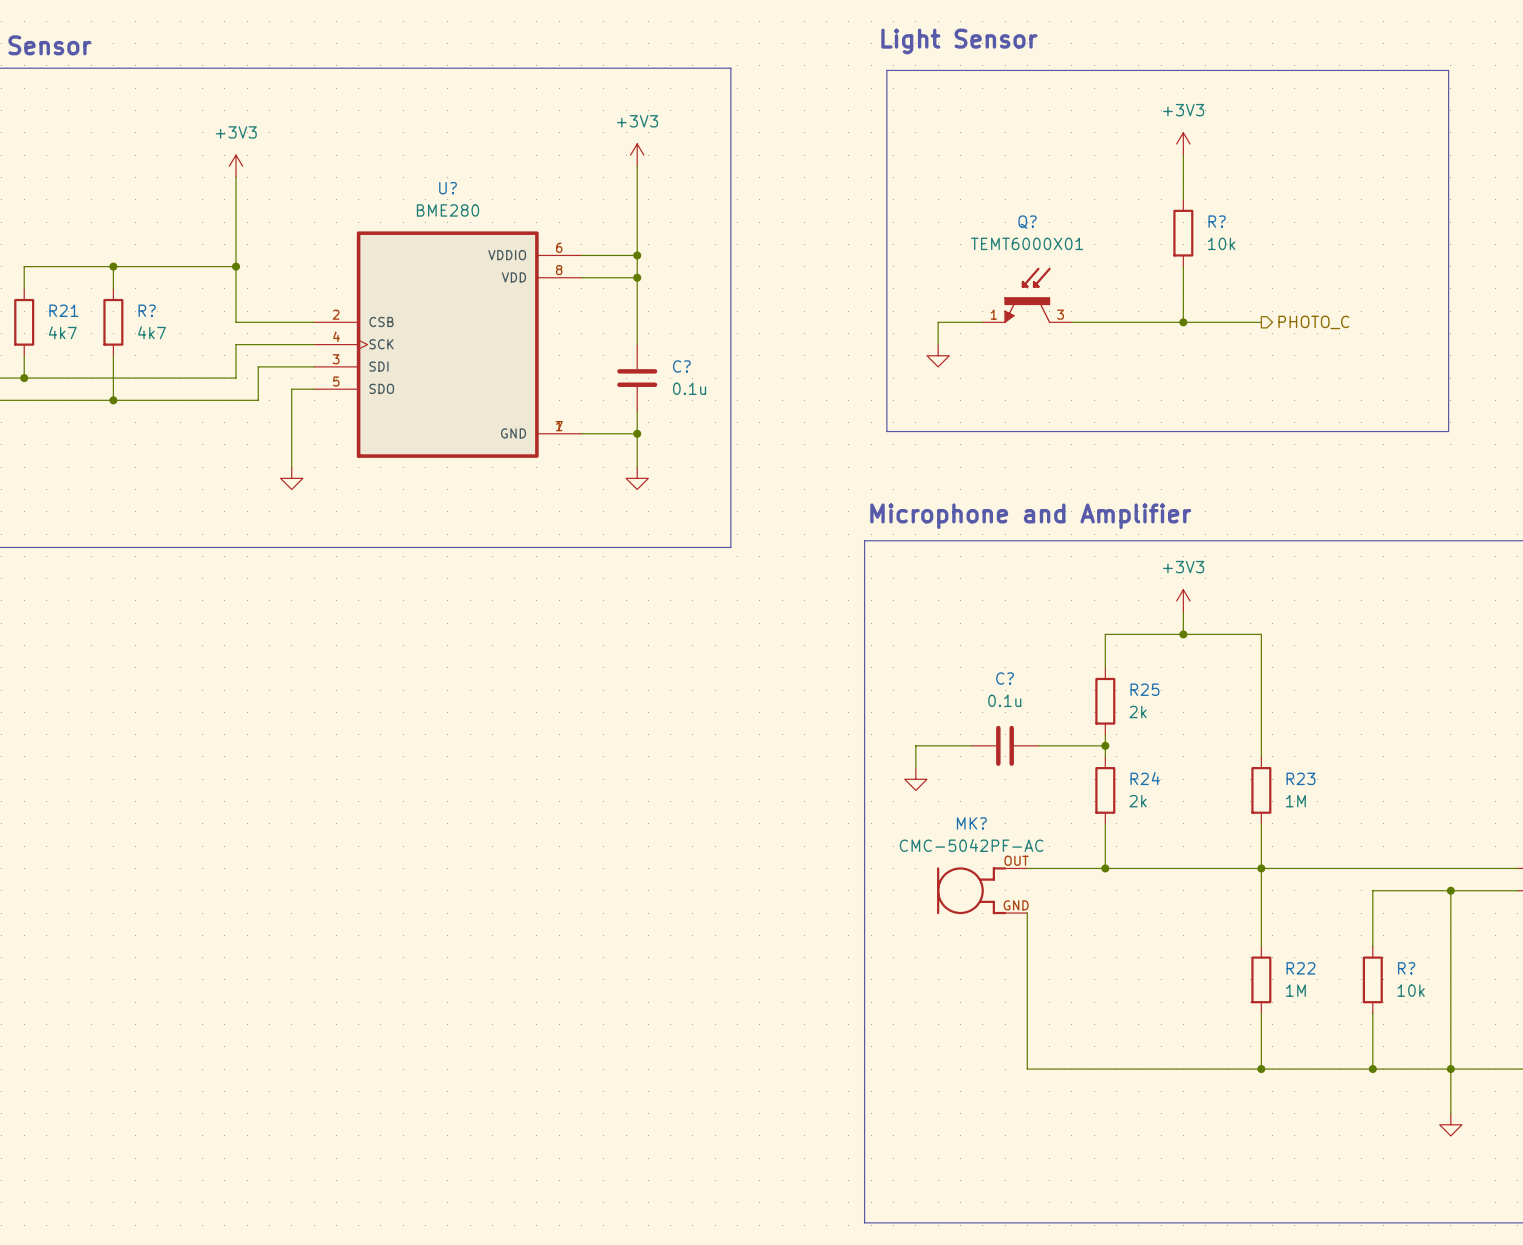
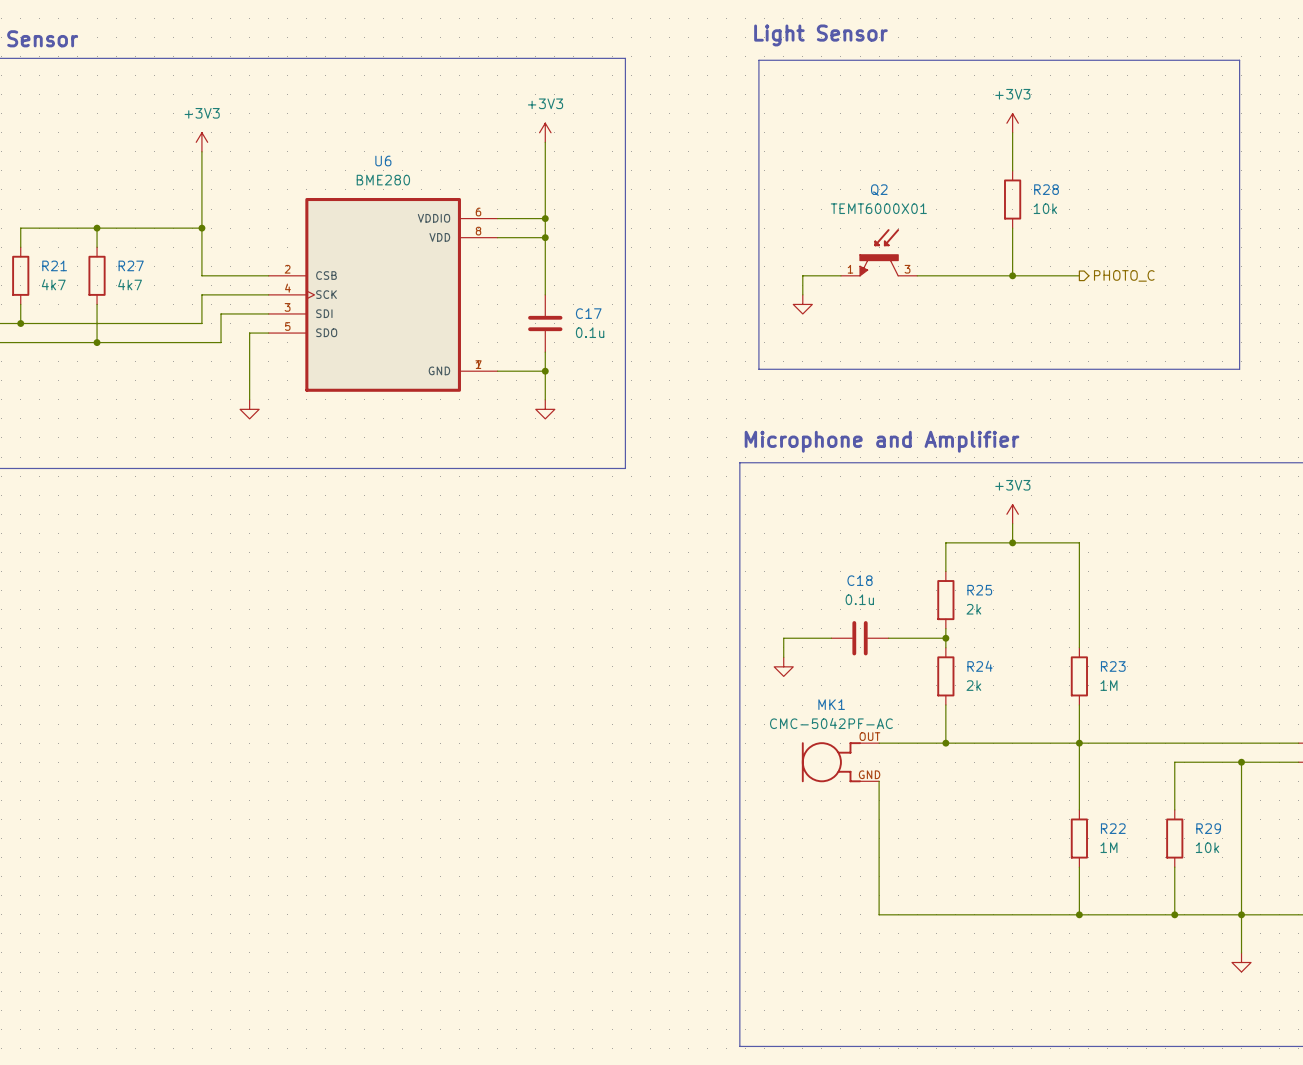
U? name: U? (448, 188) -> U6 (383, 161)
R? name: R? (1217, 221) -> R28 (1046, 189)
Q? name: Q? (1027, 222) -> Q2 (879, 190)
R? name: R? (147, 310) -> R27 (131, 265)
C? name: C? (681, 366) -> C17 (588, 313)
C? name: C? (1005, 678) -> C18 (860, 580)
MK? name: MK? (971, 823) -> MK1 (831, 704)
R? name: R? (1406, 968) -> R29 (1208, 828)

